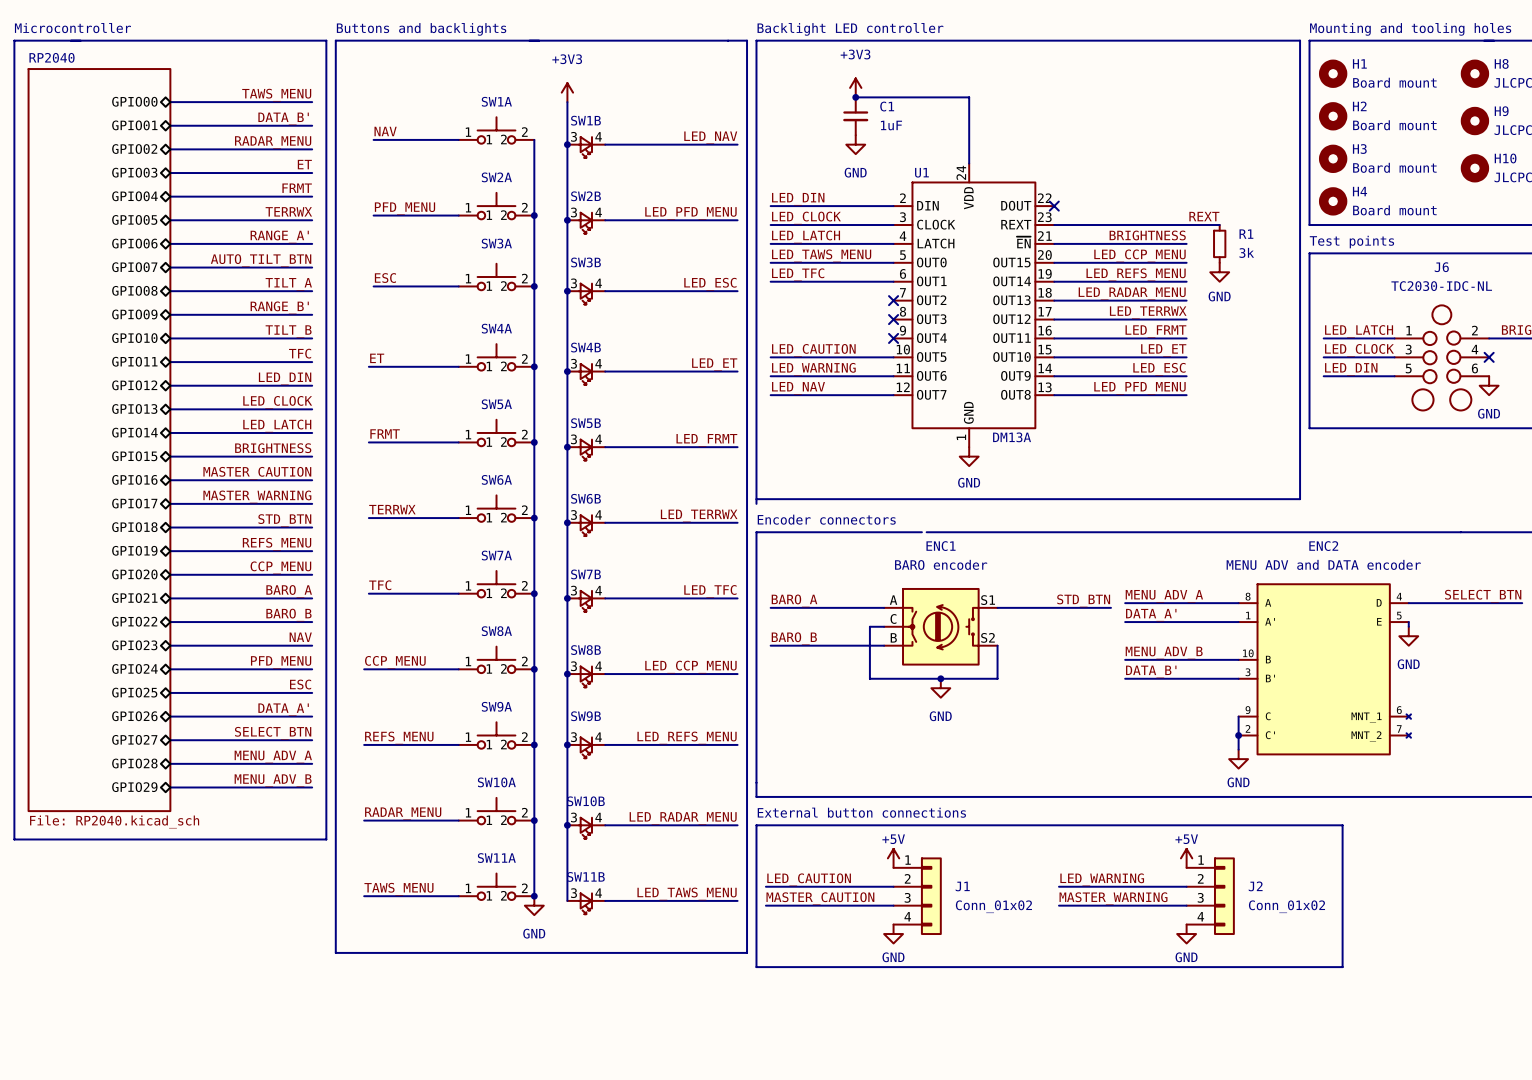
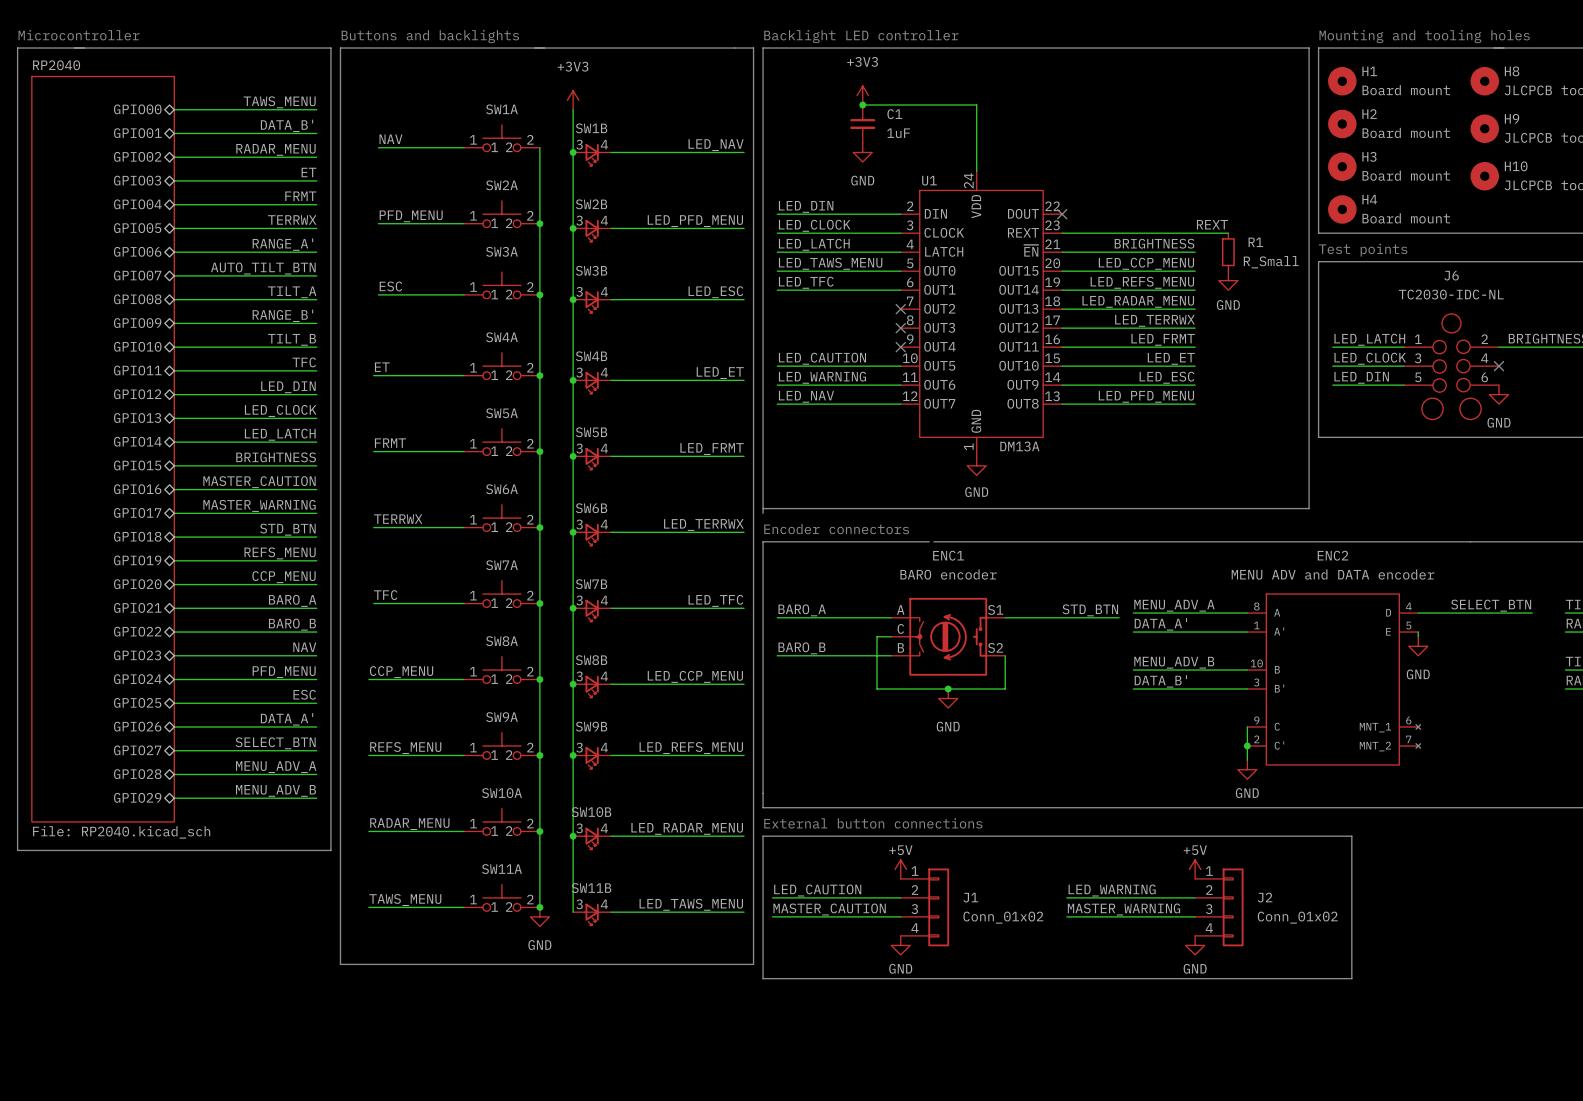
R1 value: 3k (1246, 252) -> R_Small (1271, 262)

